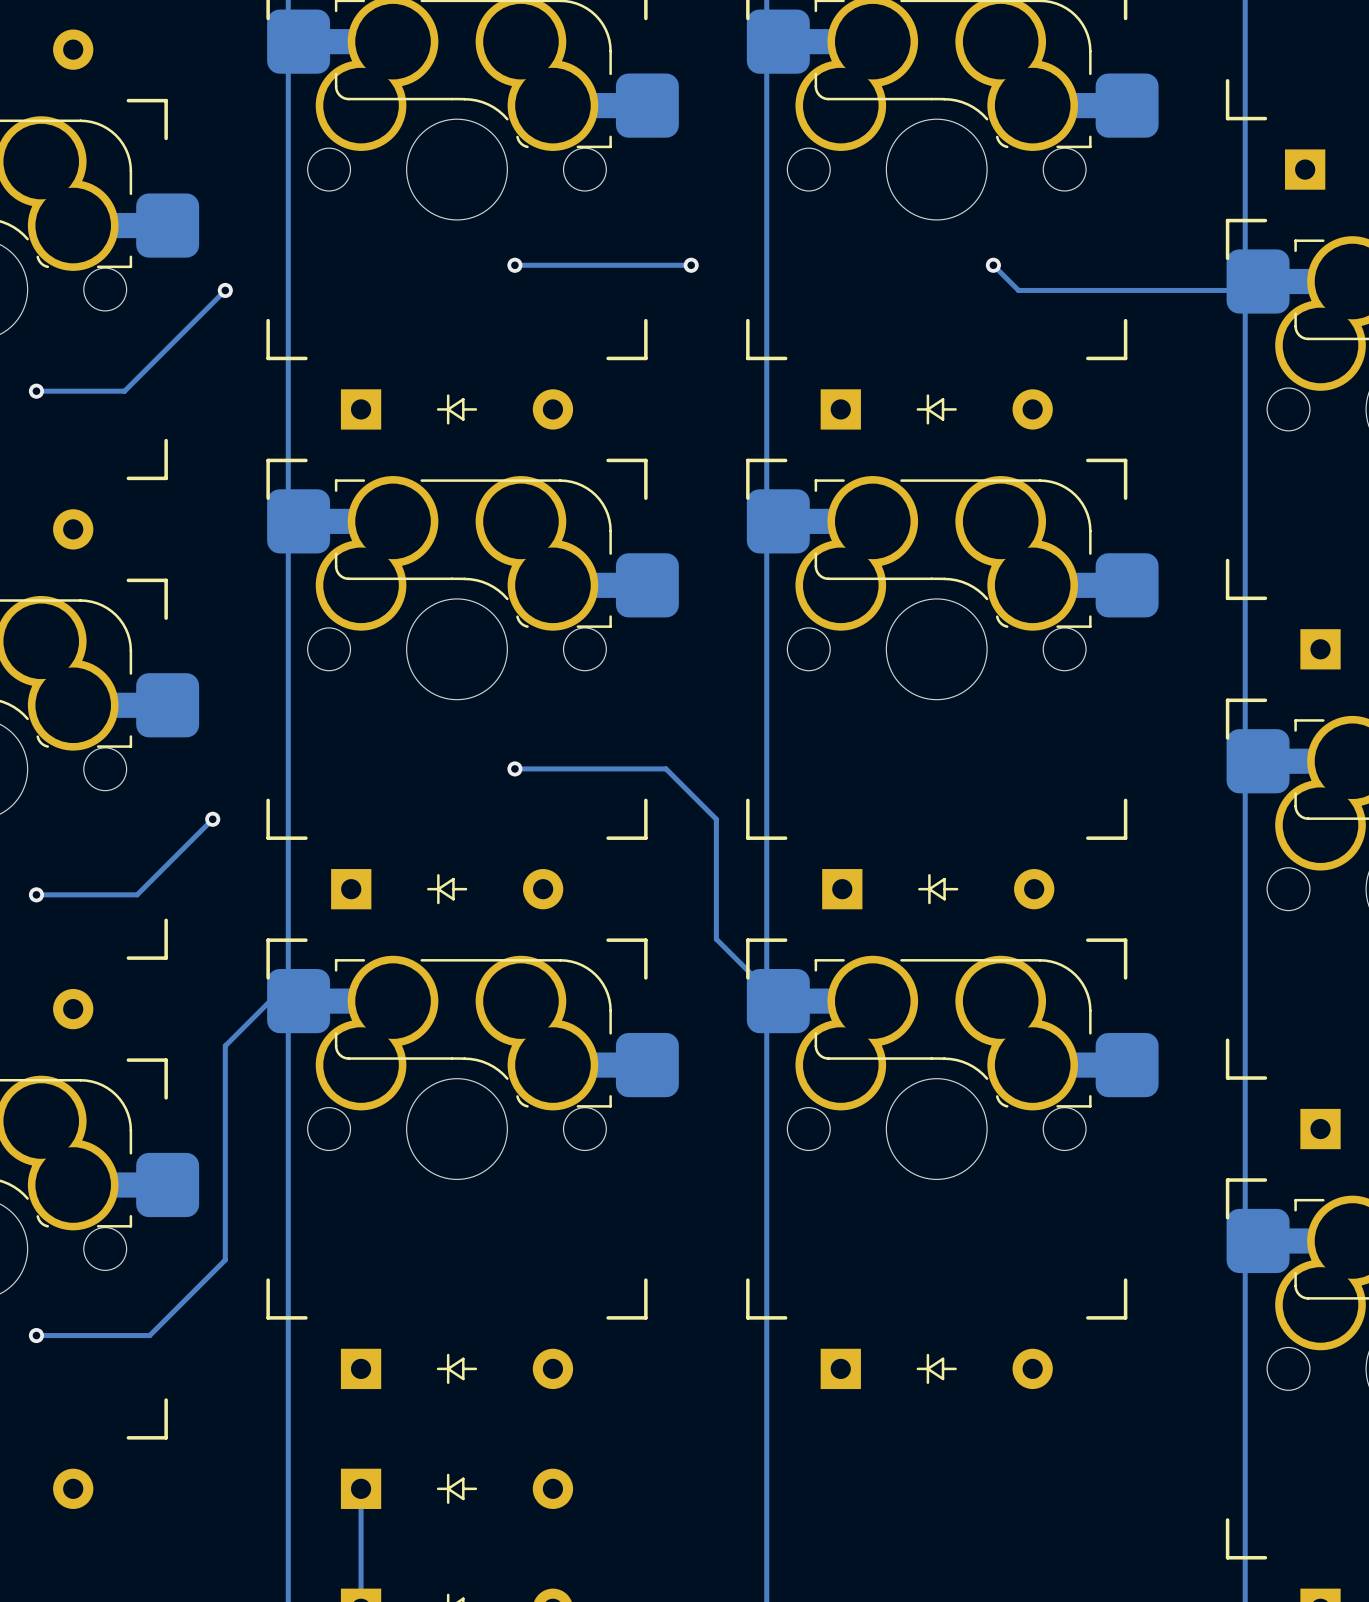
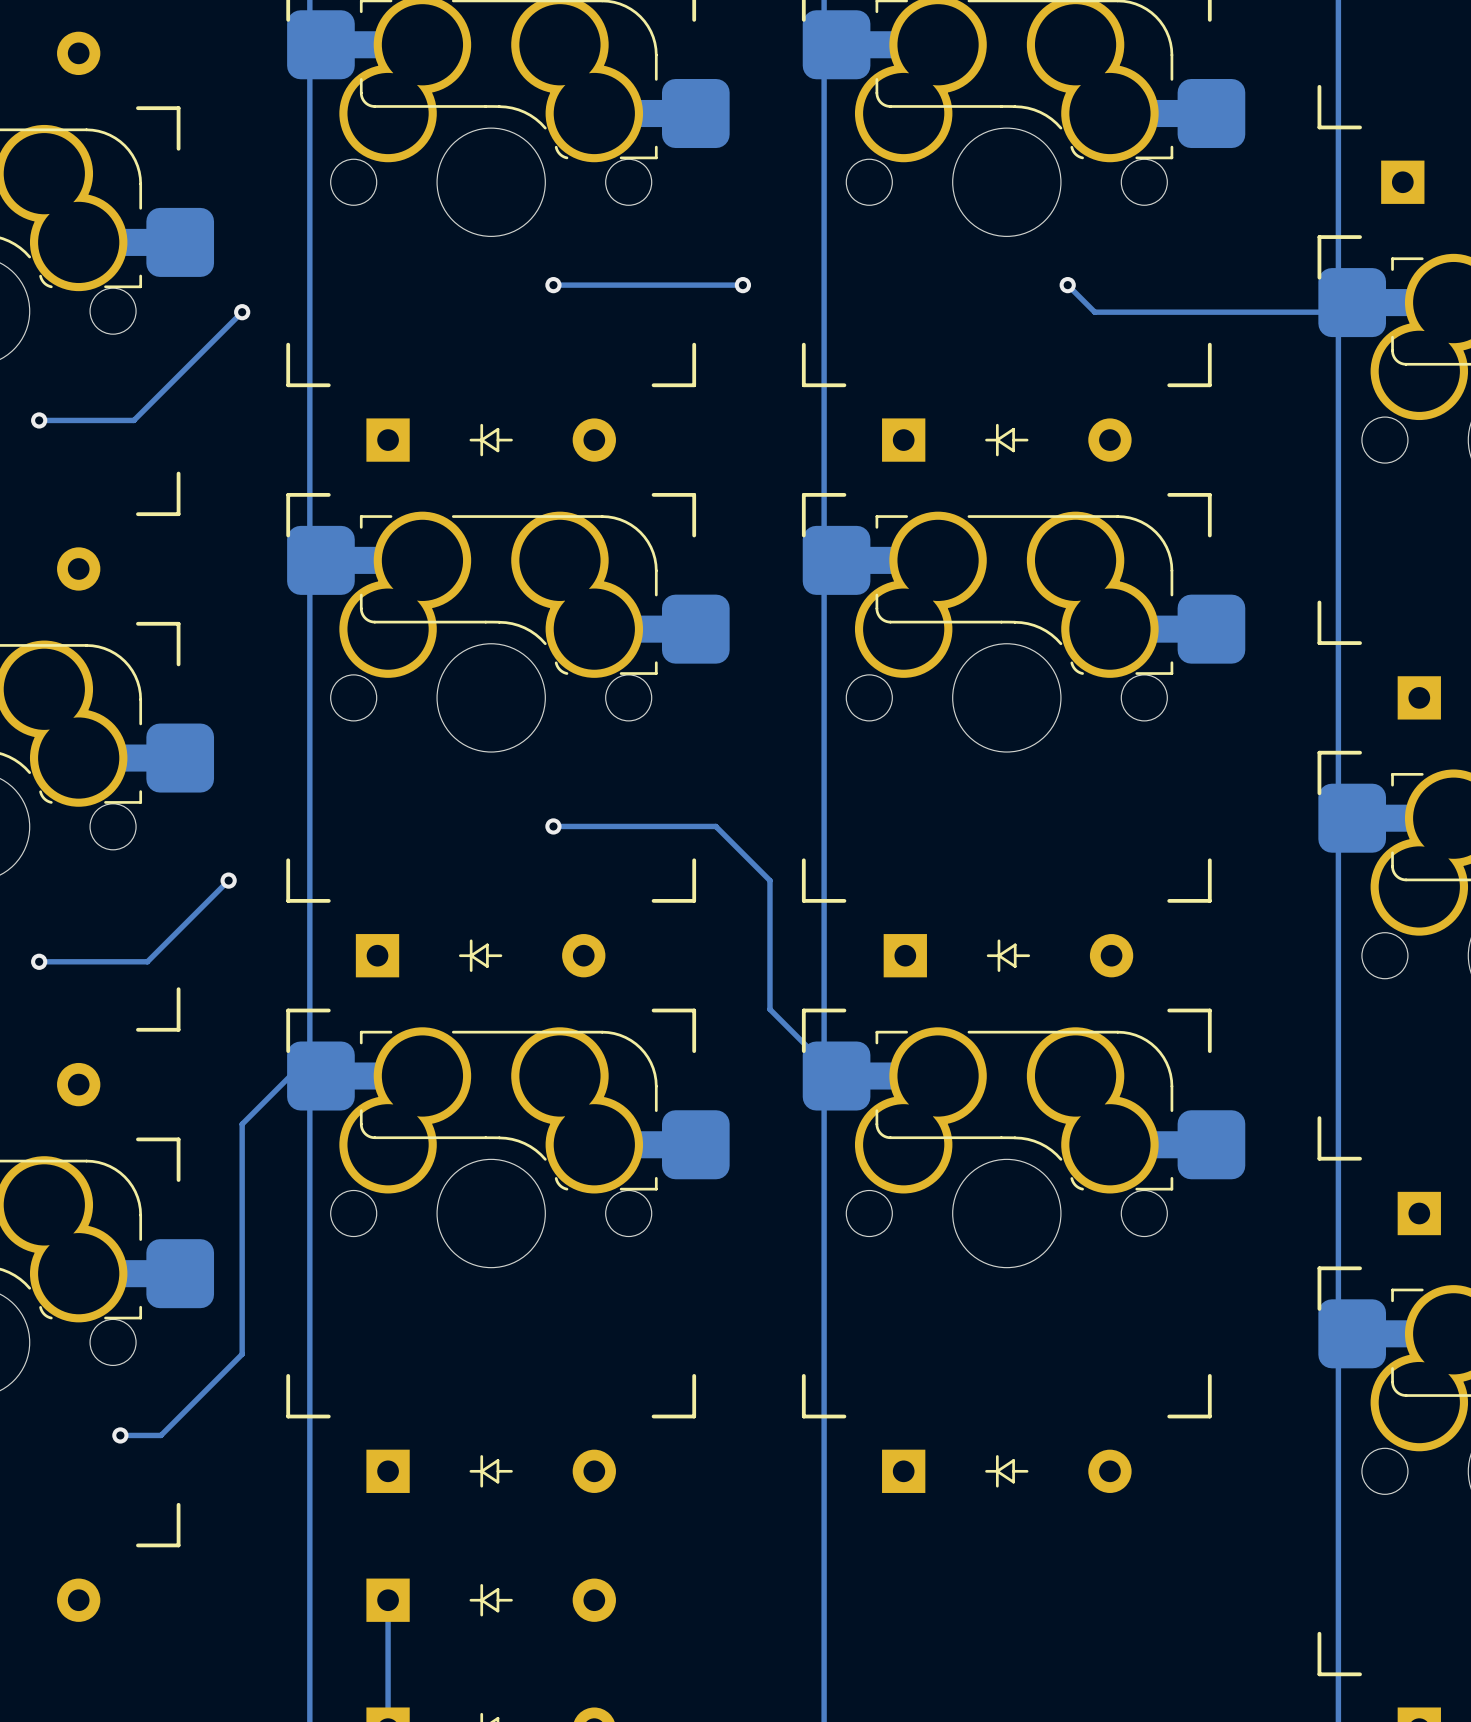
via position: (36, 1335) -> (120, 1435)
track: (111, 1335) (36, 1335) -> none

